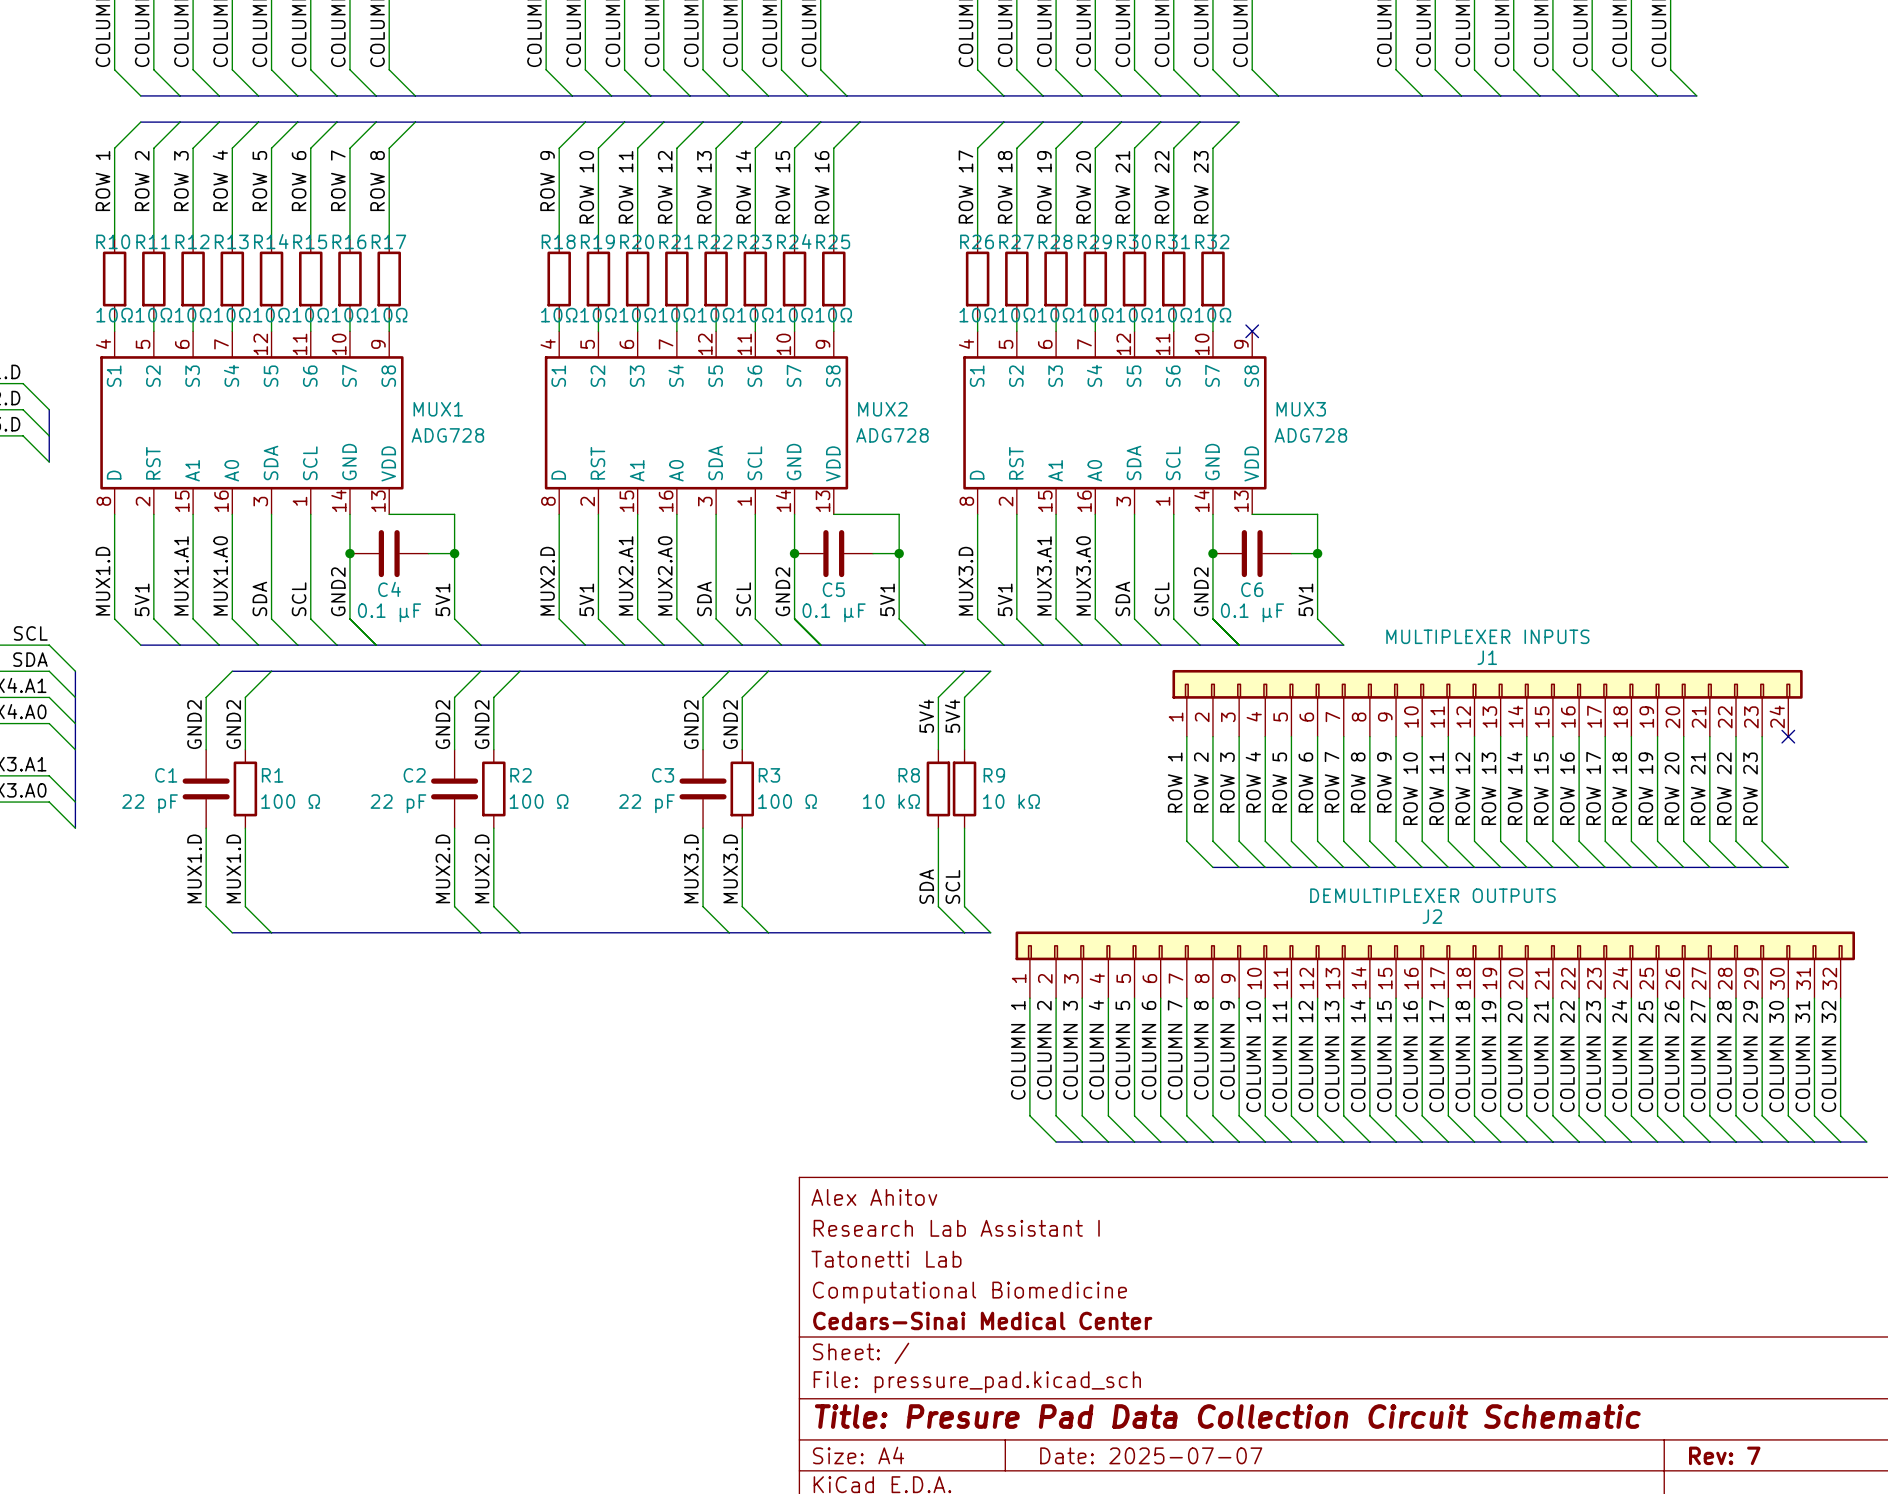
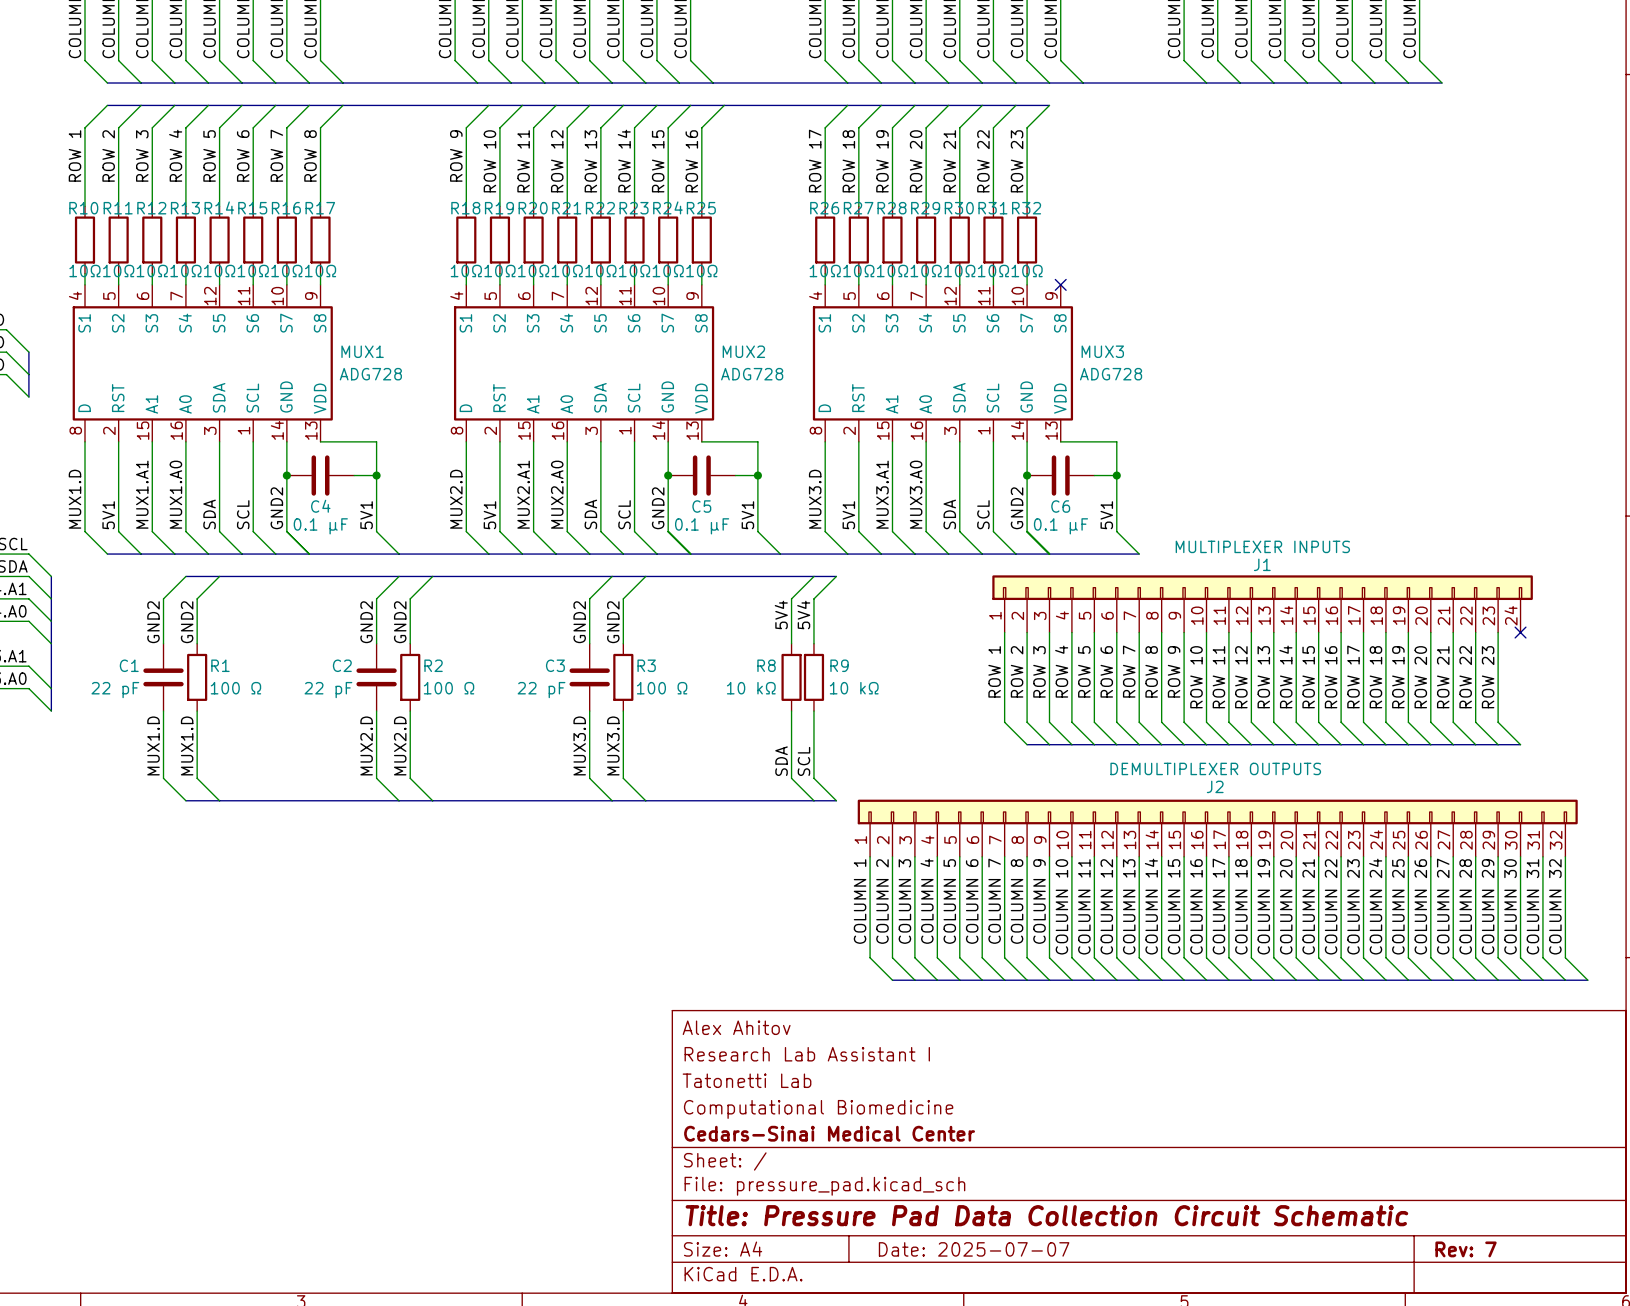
title block: Title: Presure Pad Data Collection Circuit Schematic (1227, 1416) -> Title: Pressure Pad Data Collection Circuit Schematic (1046, 1215)

